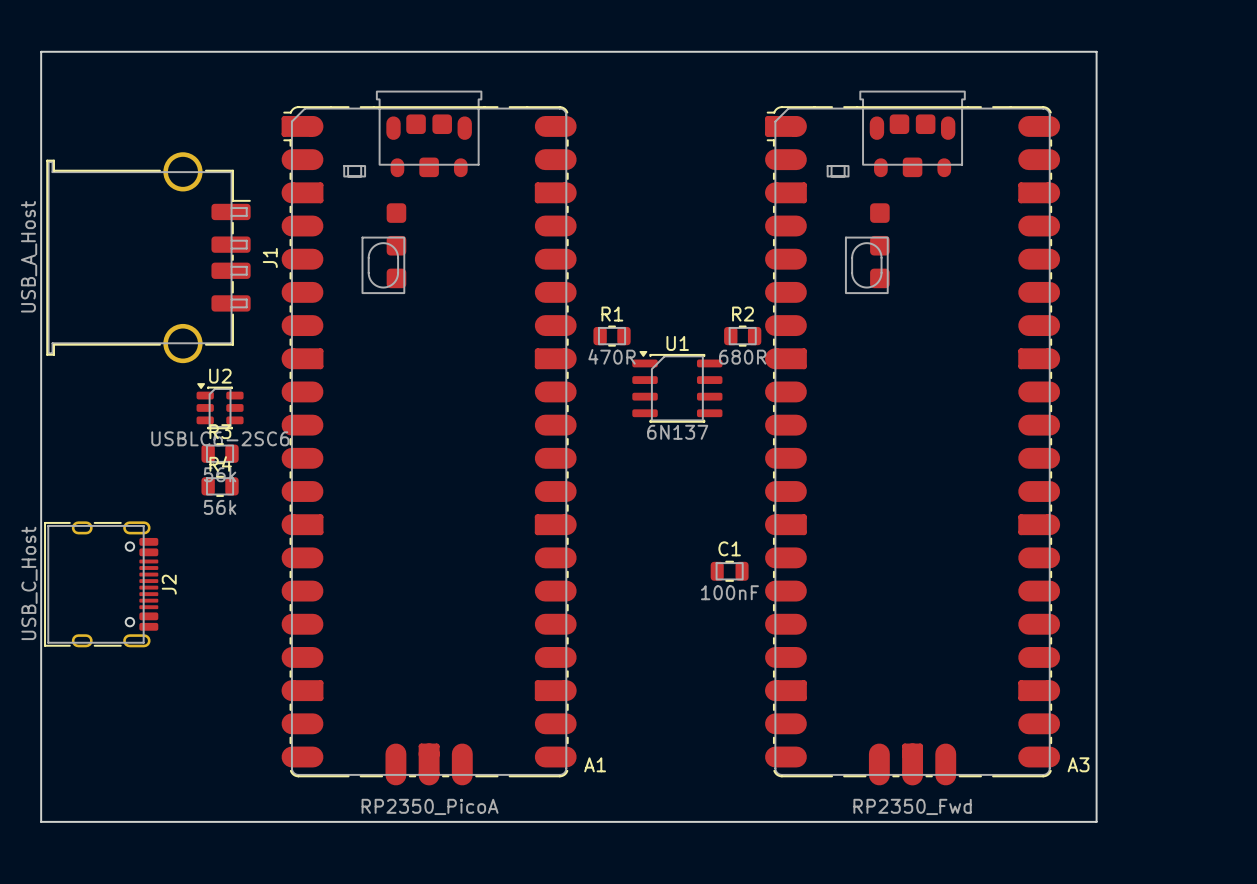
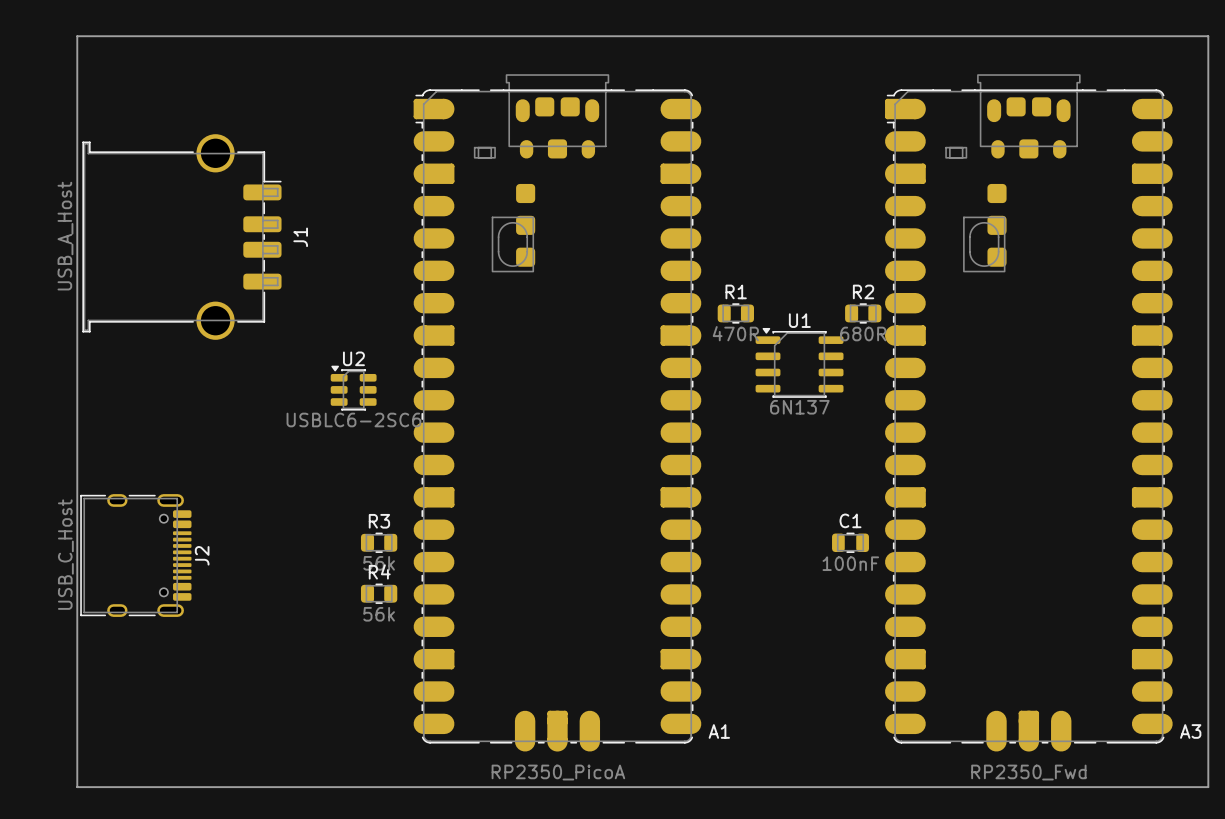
board edge: (1096, 51) (1096, 821) -> (1106, 36) (1208, 36) (1208, 787) (1106, 787)
R1 position: (612, 336) -> (735, 313)
R2 position: (742, 336) -> (863, 313)
U1 position: (677, 386) -> (799, 362)
U2 position: (220, 406) -> (353, 388)
A1 position: (429, 438) -> (557, 412)
A3 position: (912, 438) -> (1028, 412)
R3 position: (220, 453) -> (379, 542)
R4 position: (220, 486) -> (379, 593)
C1 position: (729, 571) -> (850, 542)

